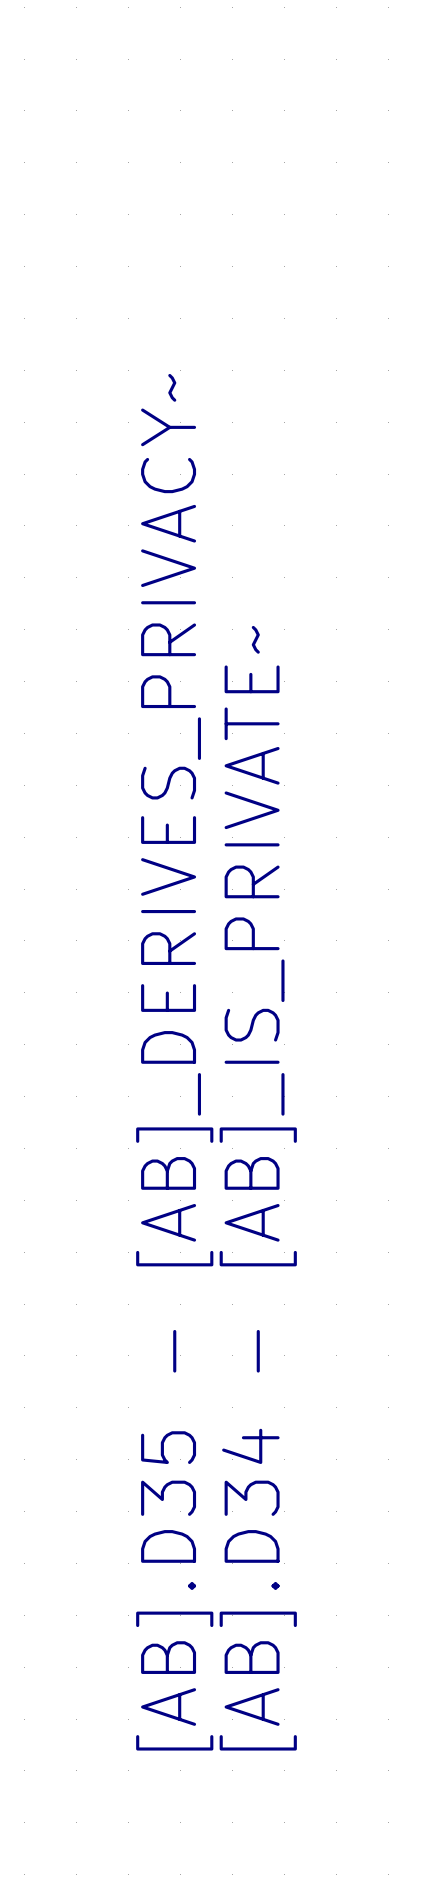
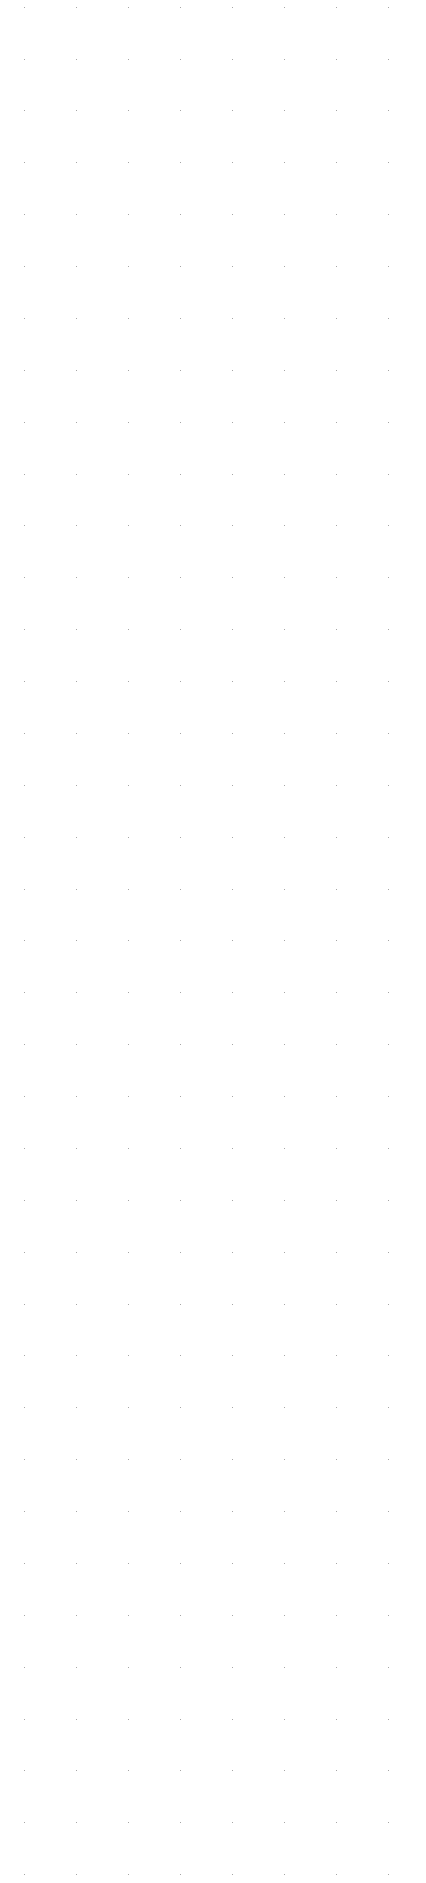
text: [AB].D35 - [AB]_DERIVES_PRIVACY~ (174, 1062) -> none
text: [AB].D34 - [AB]_IS_PRIVATE~ (258, 1188) -> none

